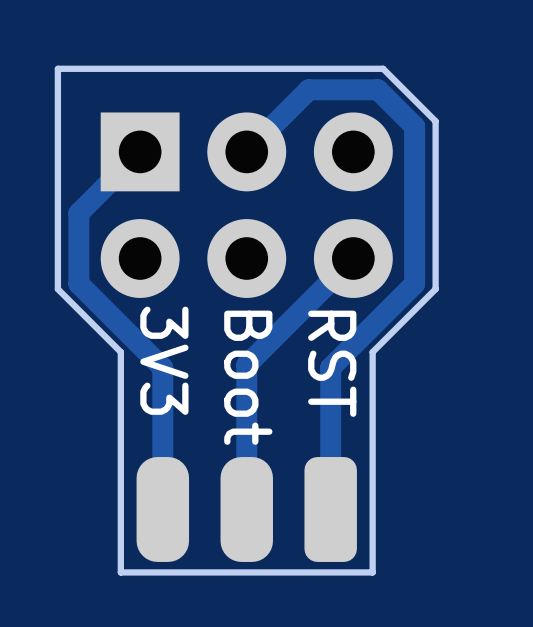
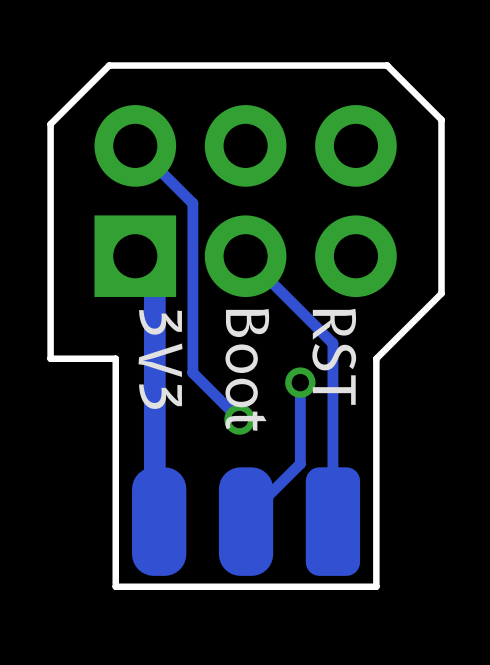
board edge: (114, 68) (57, 68) (57, 125) -> (109, 65) (50, 124)
track: none -> (135, 145) (192, 203) (192, 372) (239, 419)
track: (140, 151) (78, 213) (78, 283) (162, 367) (162, 509) -> (135, 256) (154, 275) (154, 517) (159, 521)
track: (246, 151) (308, 89) (377, 89) (414, 126) (414, 283) (330, 367) -> (245, 256) (332, 343) (332, 375)
part side: top (246, 205) -> bottom (245, 201)
track: (353, 258) (246, 365) (246, 506) -> (300, 382) (300, 463) (246, 518)
board edge: (57, 289) (120, 352) -> (50, 293) (50, 358) (115, 358)
track width: thick (330, 367) (330, 509) -> thin (332, 375) (332, 521)
via: none -> (300, 382)
via: none -> (239, 419)

